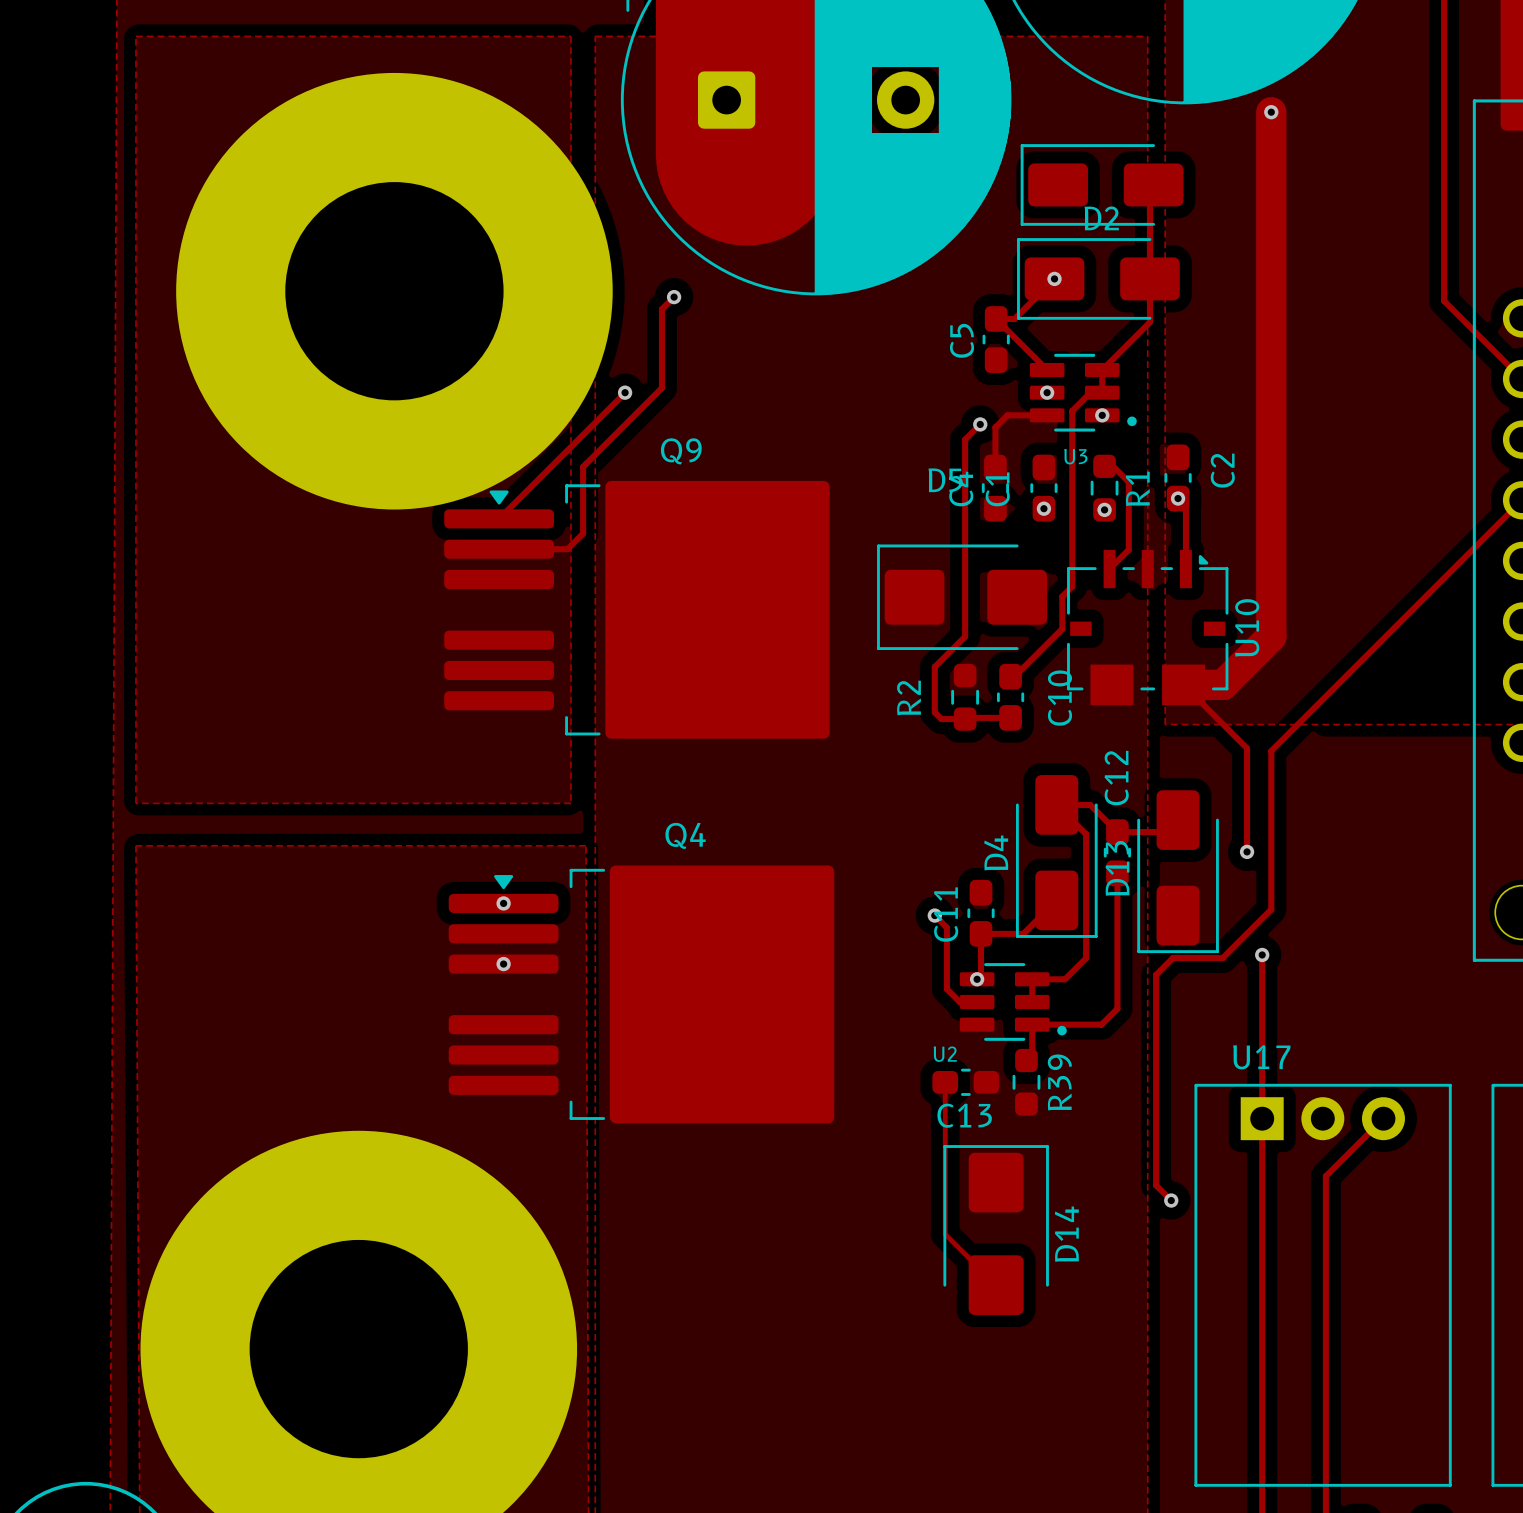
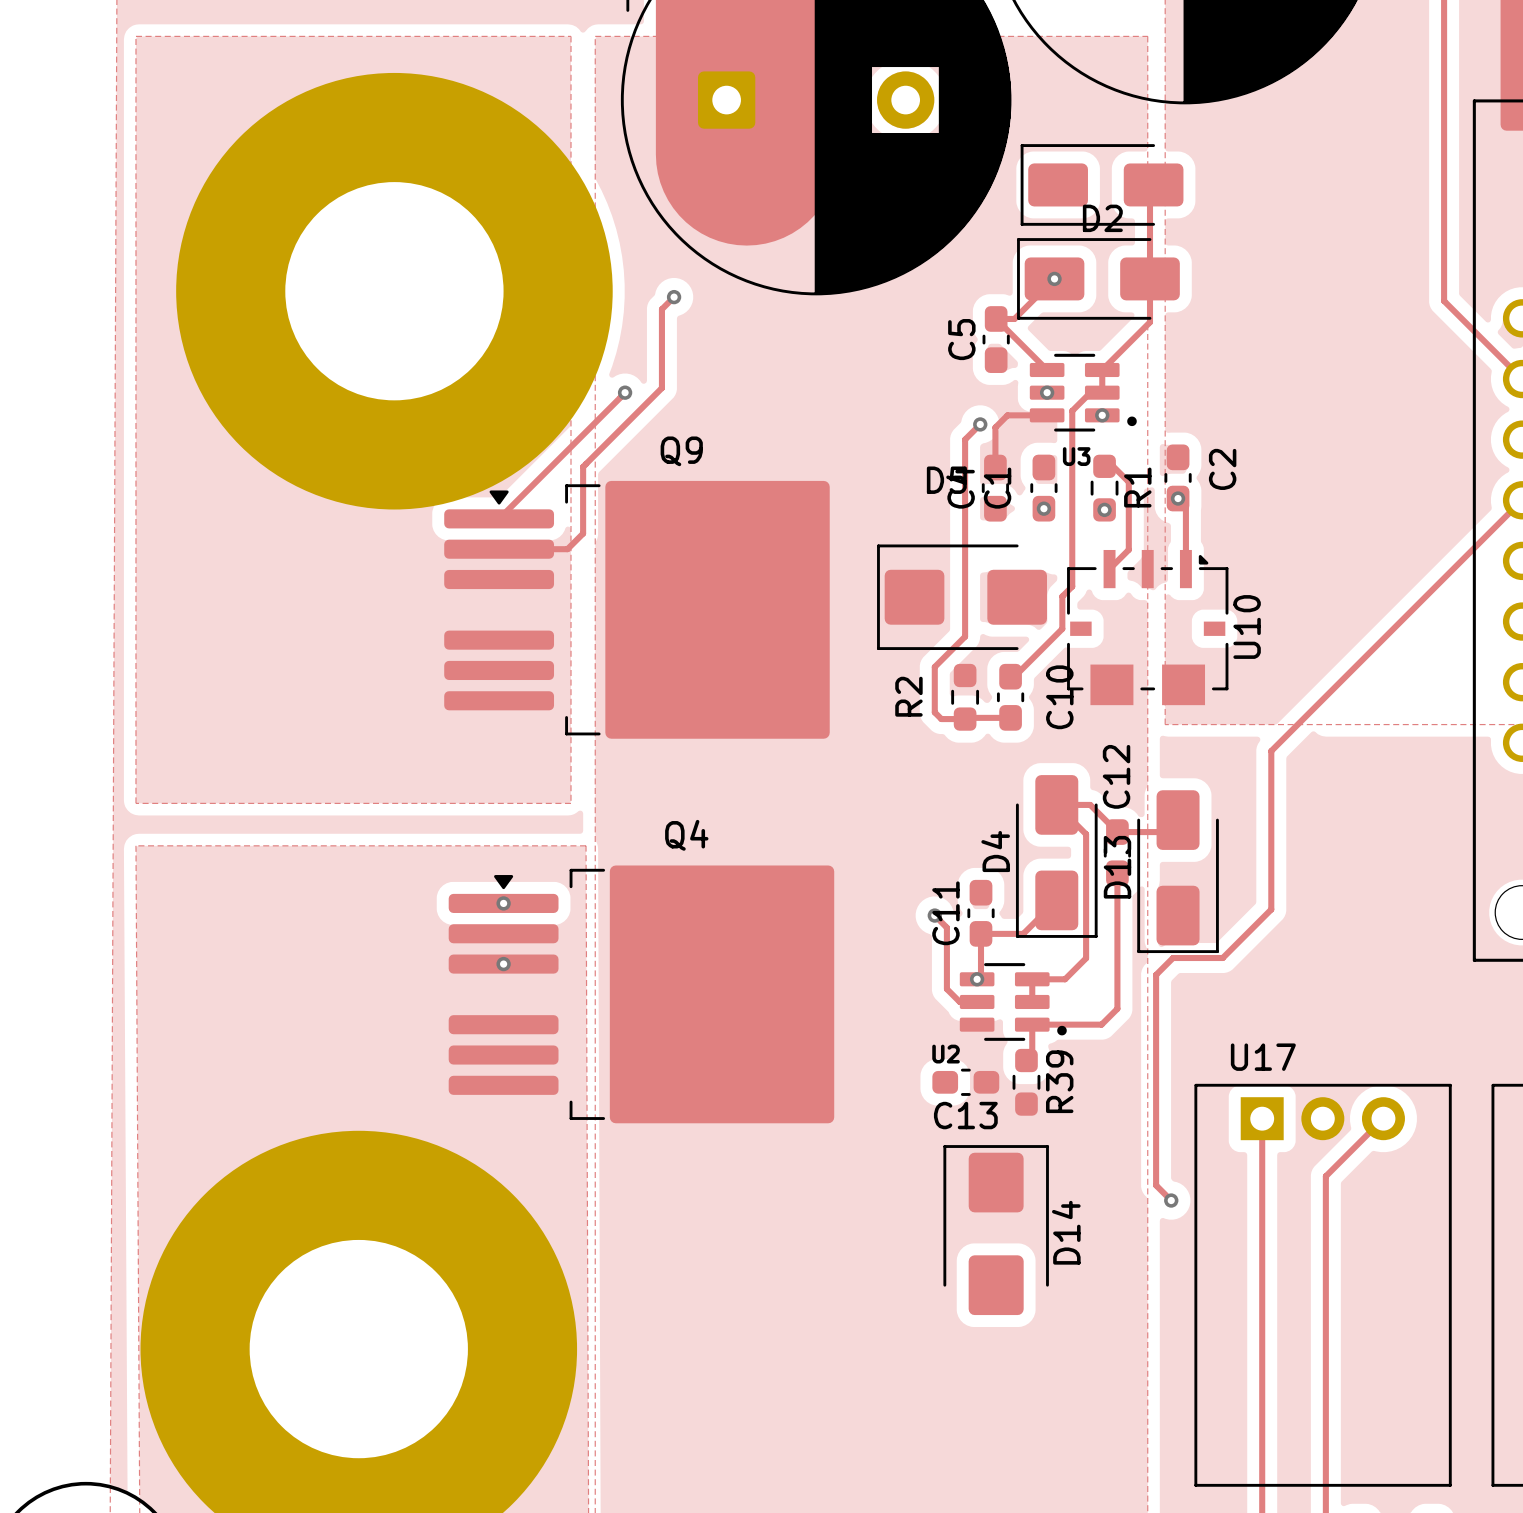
track: (1271, 112) (1271, 636) (1223, 684) (1183, 684) (1247, 748) (1247, 851) -> none
via: (1271, 112) -> none
via: (1247, 851) -> none
track: (1262, 954) (1262, 1118) -> none
via: (1262, 954) -> none
track: (945, 1082) (945, 1234) (996, 1285) -> none

